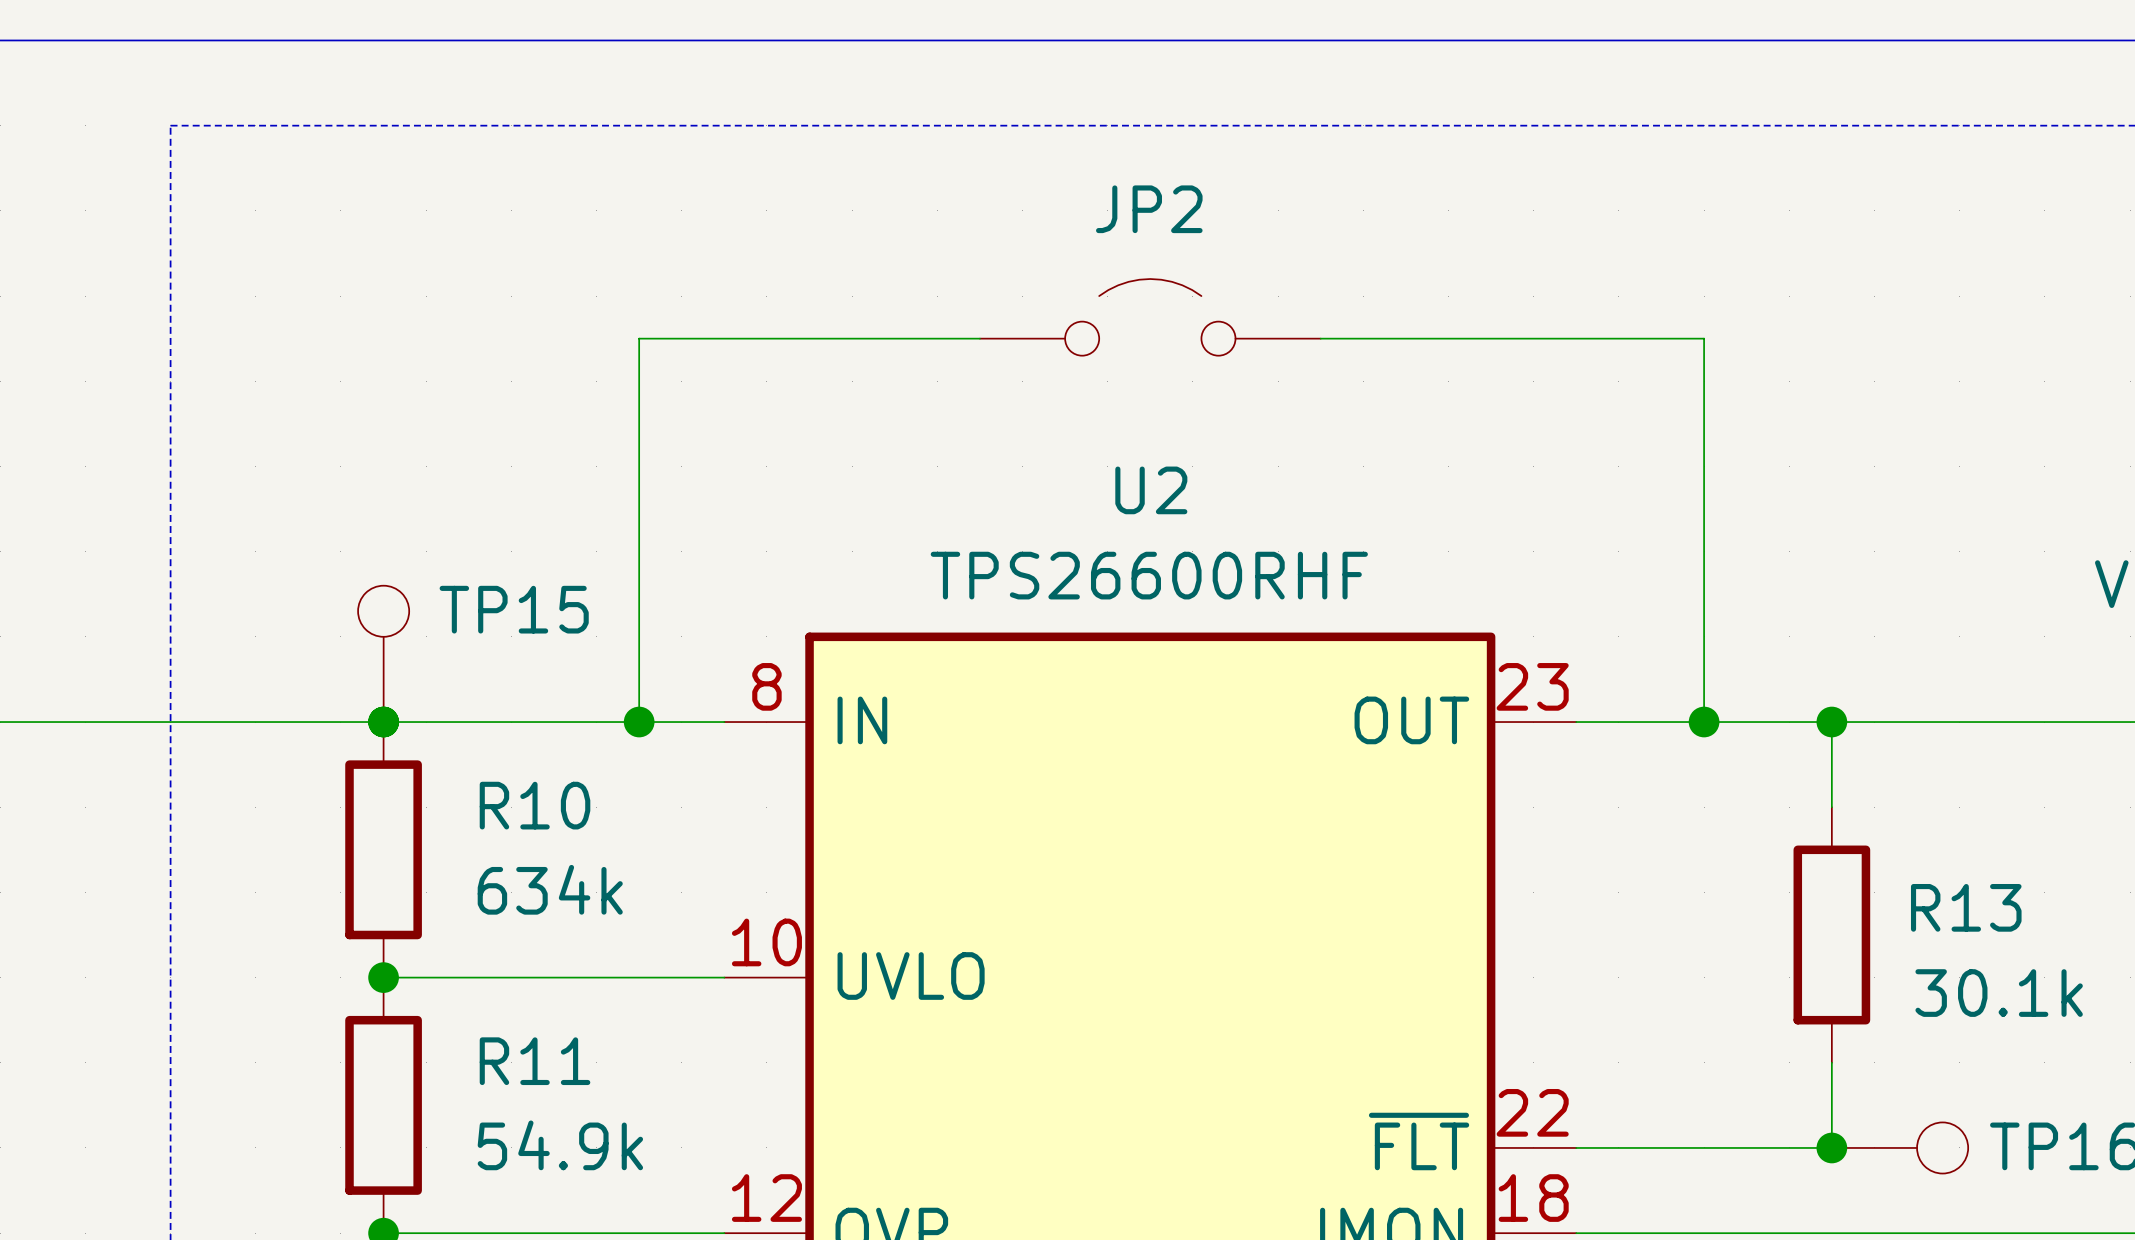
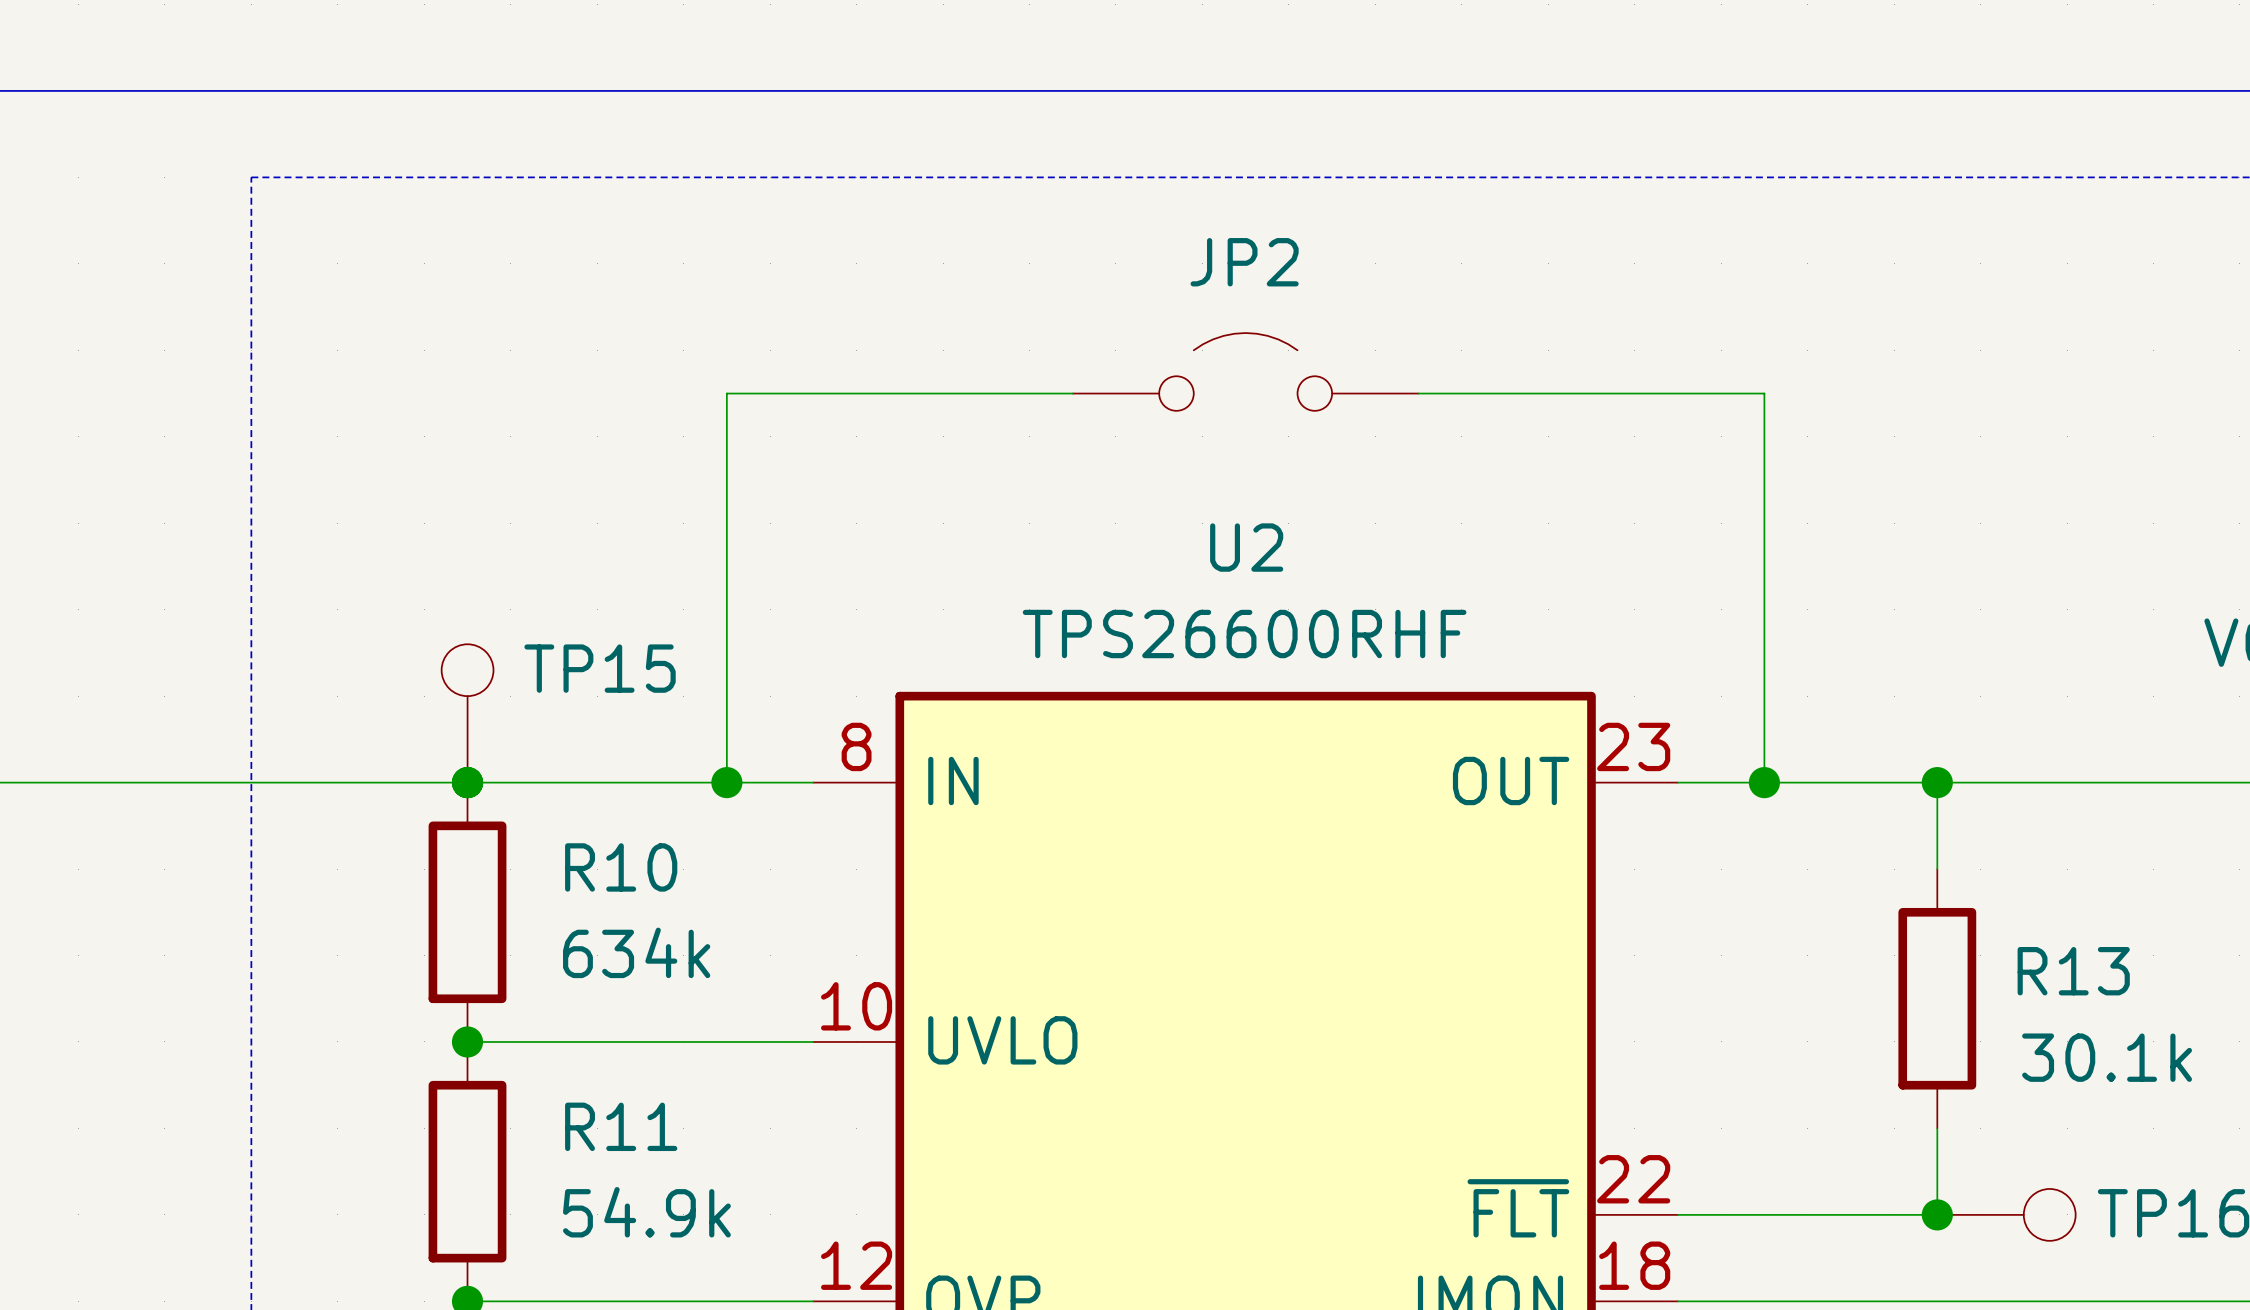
wire: (1661, 338) (1704, 338) (1704, 722) -> (1764, 393) (1764, 782)
junction position: (1704, 722) -> (1764, 782)

